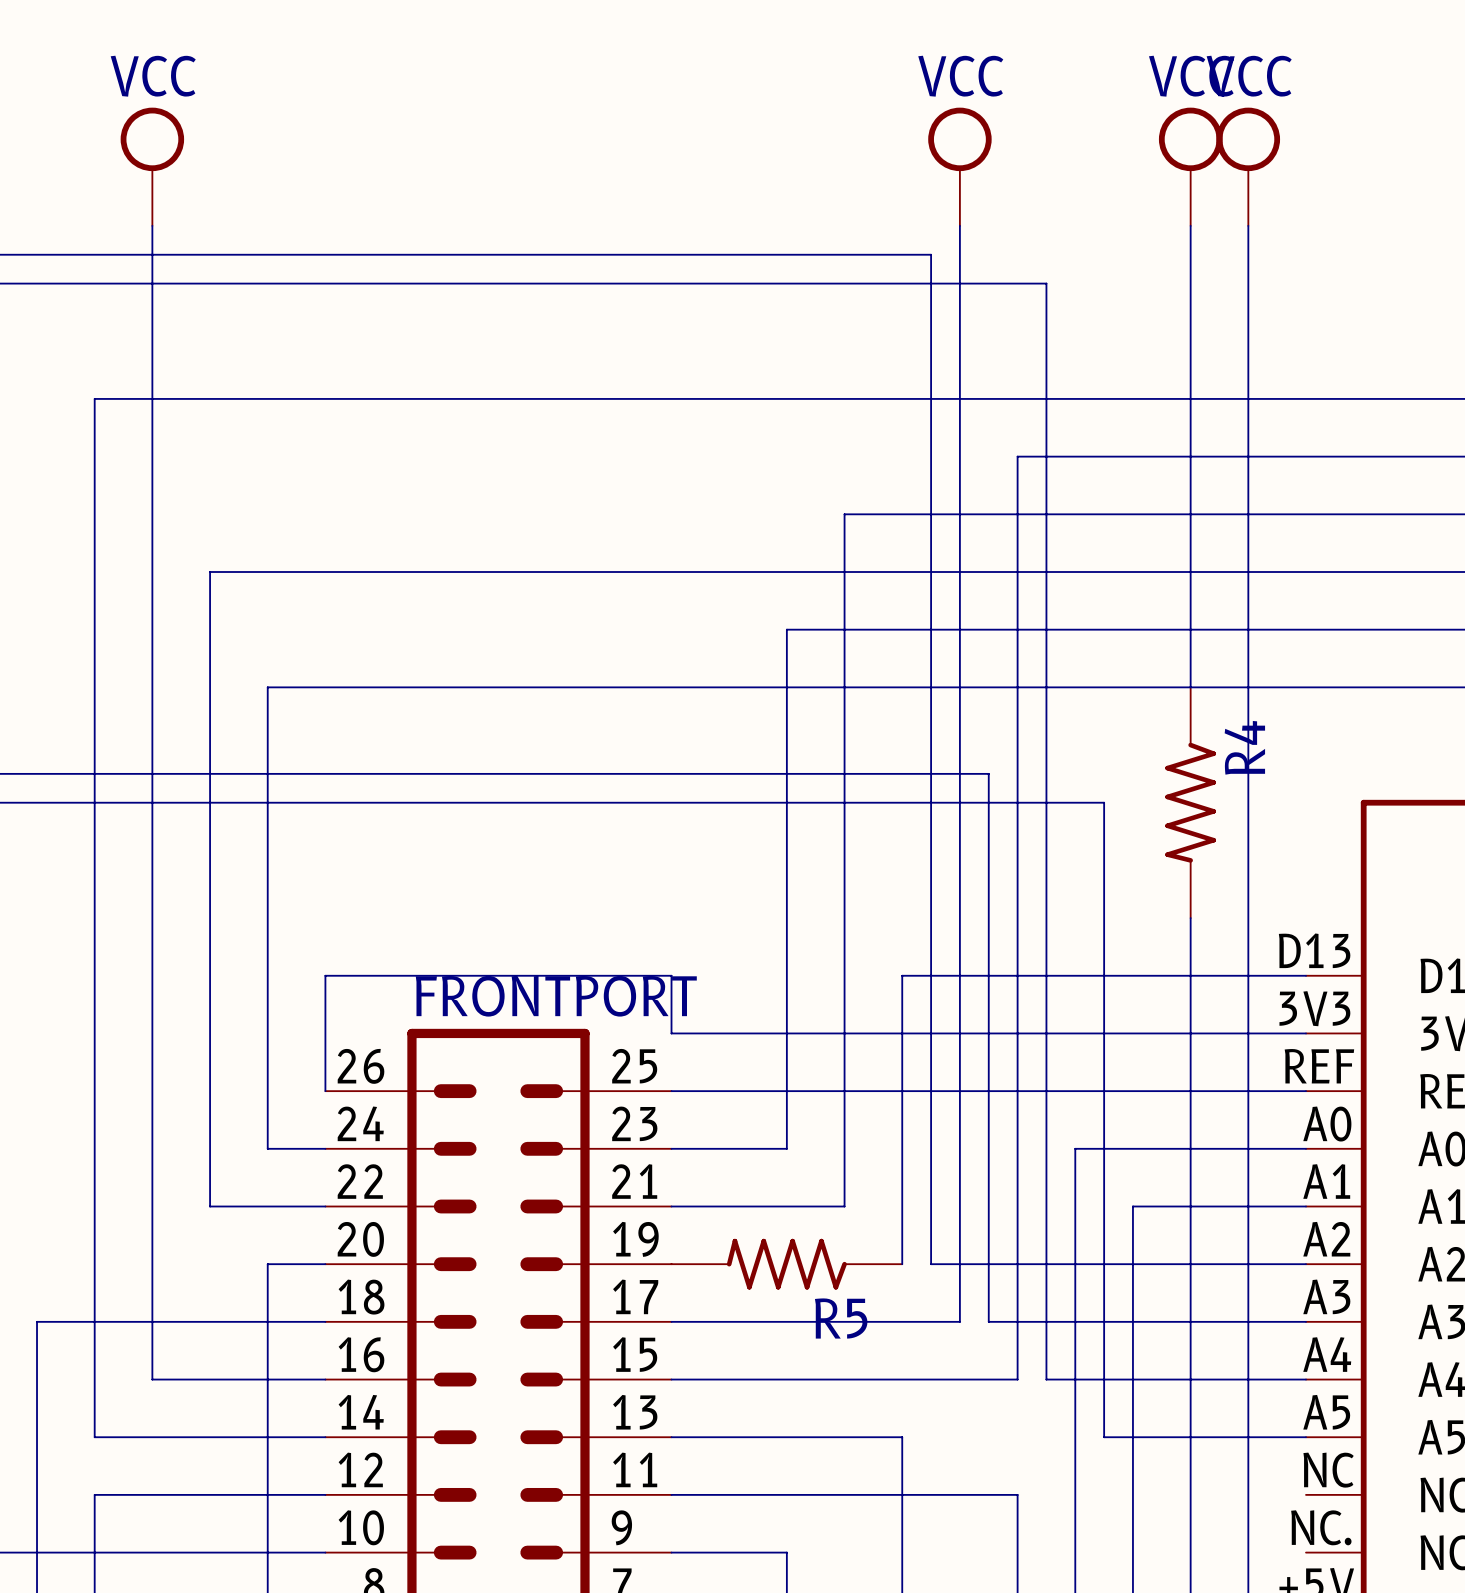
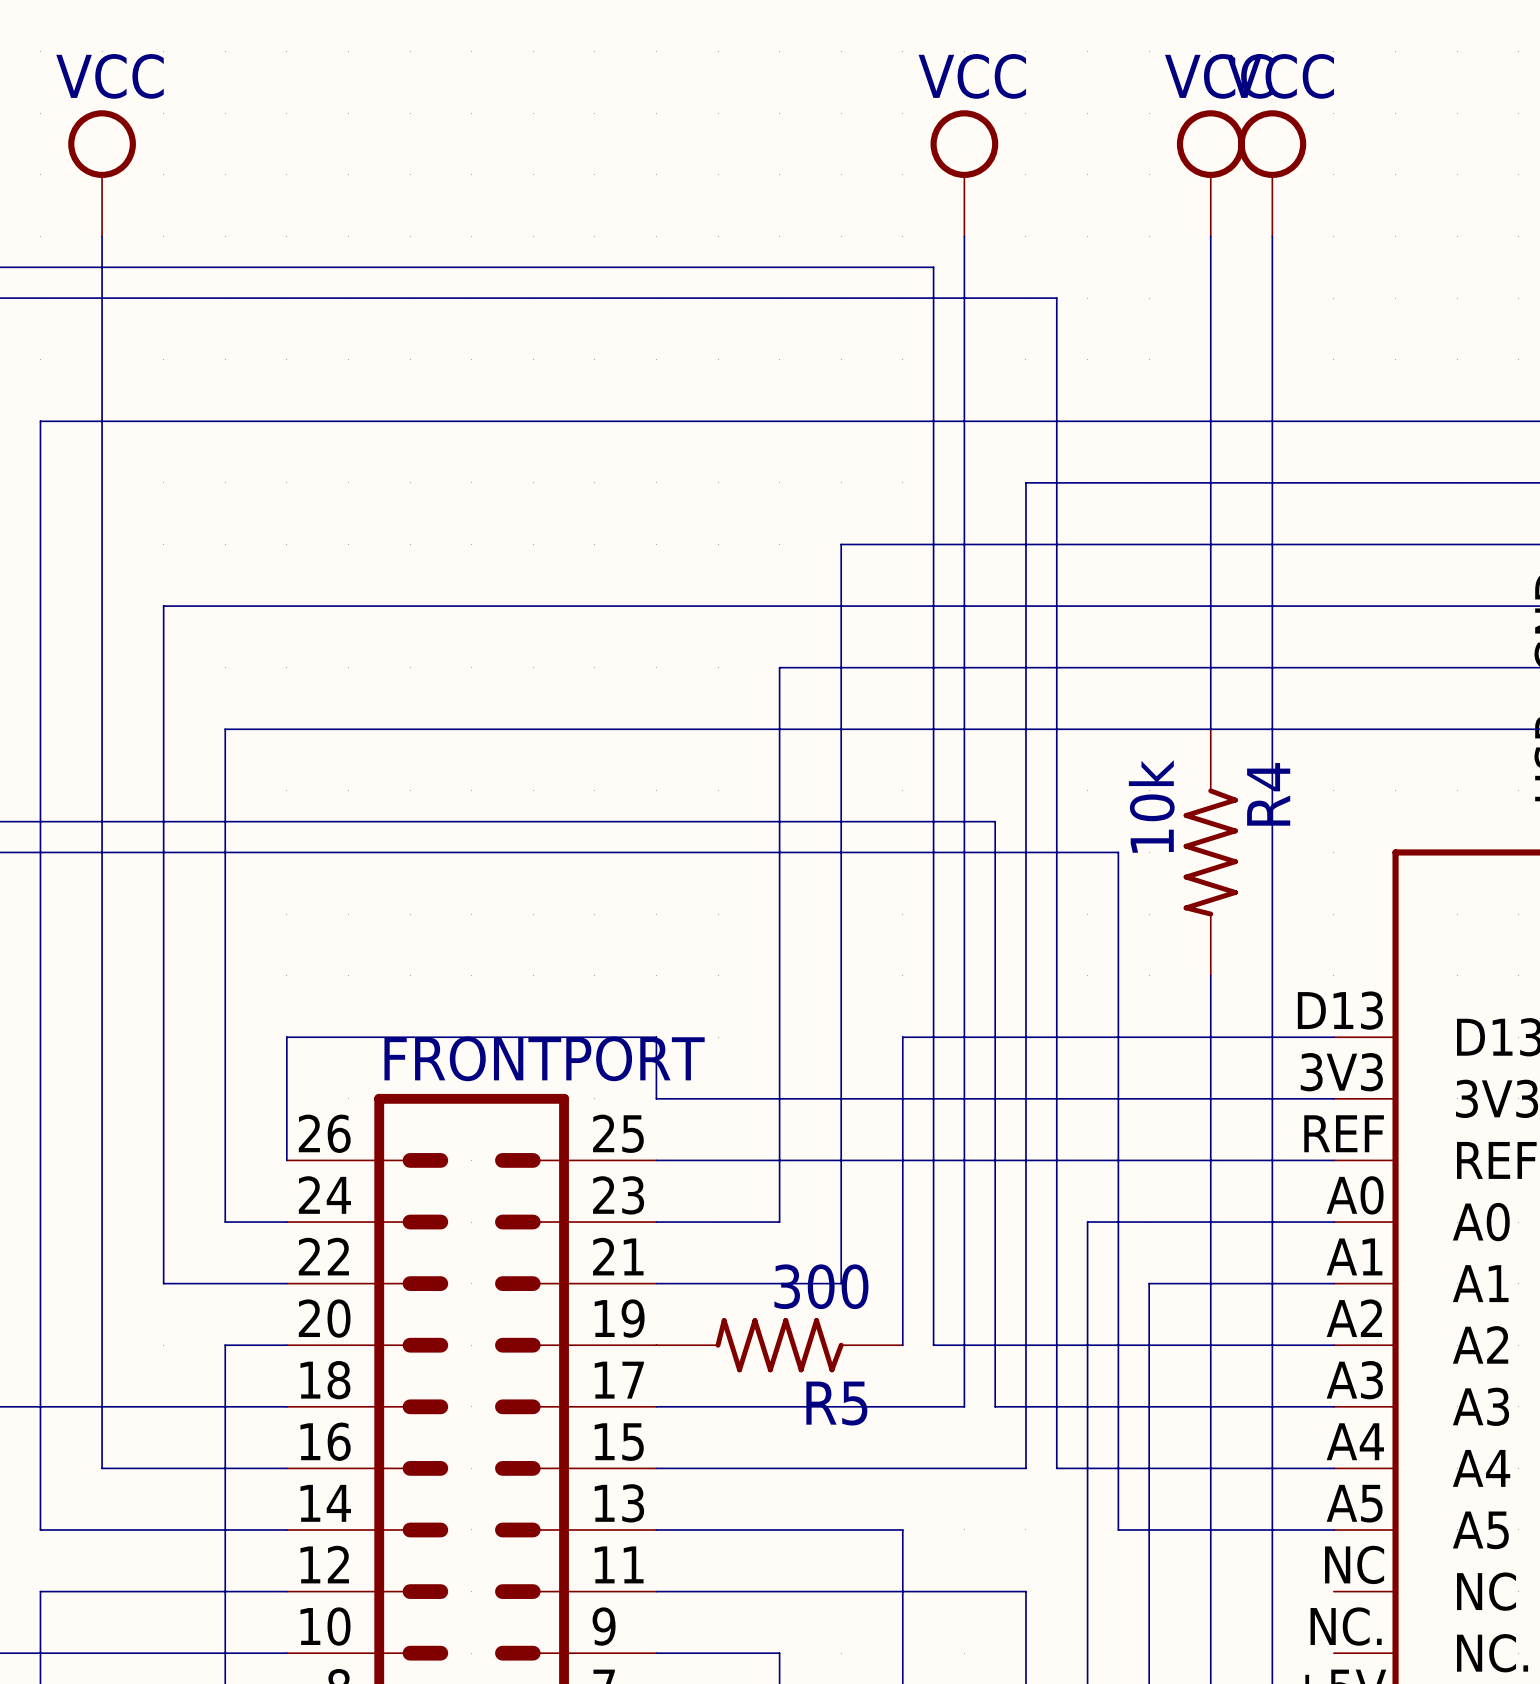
R4 value: none -> 10k (1151, 806)
R5 value: none -> 300 (821, 1286)

